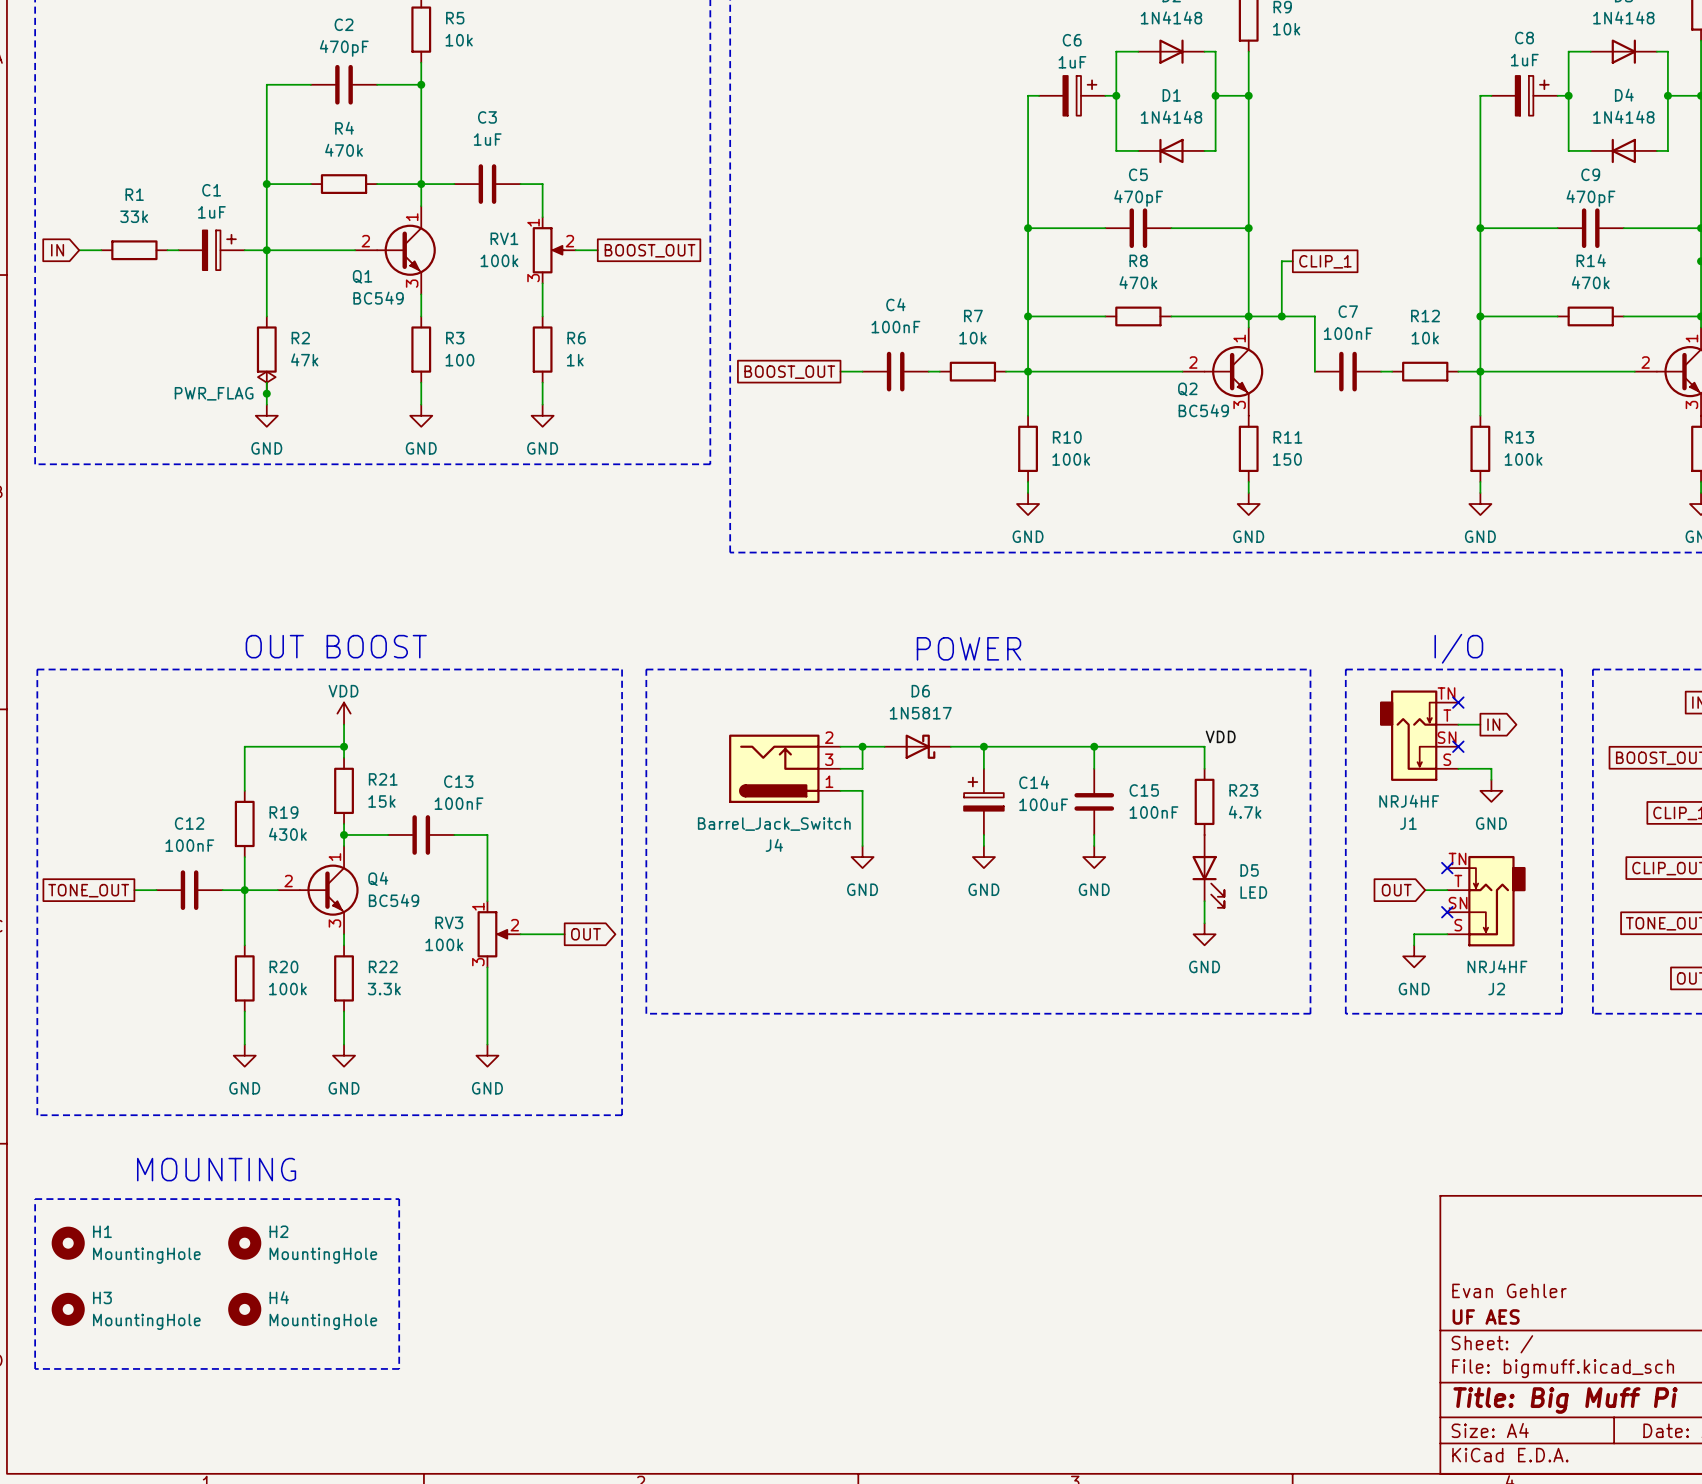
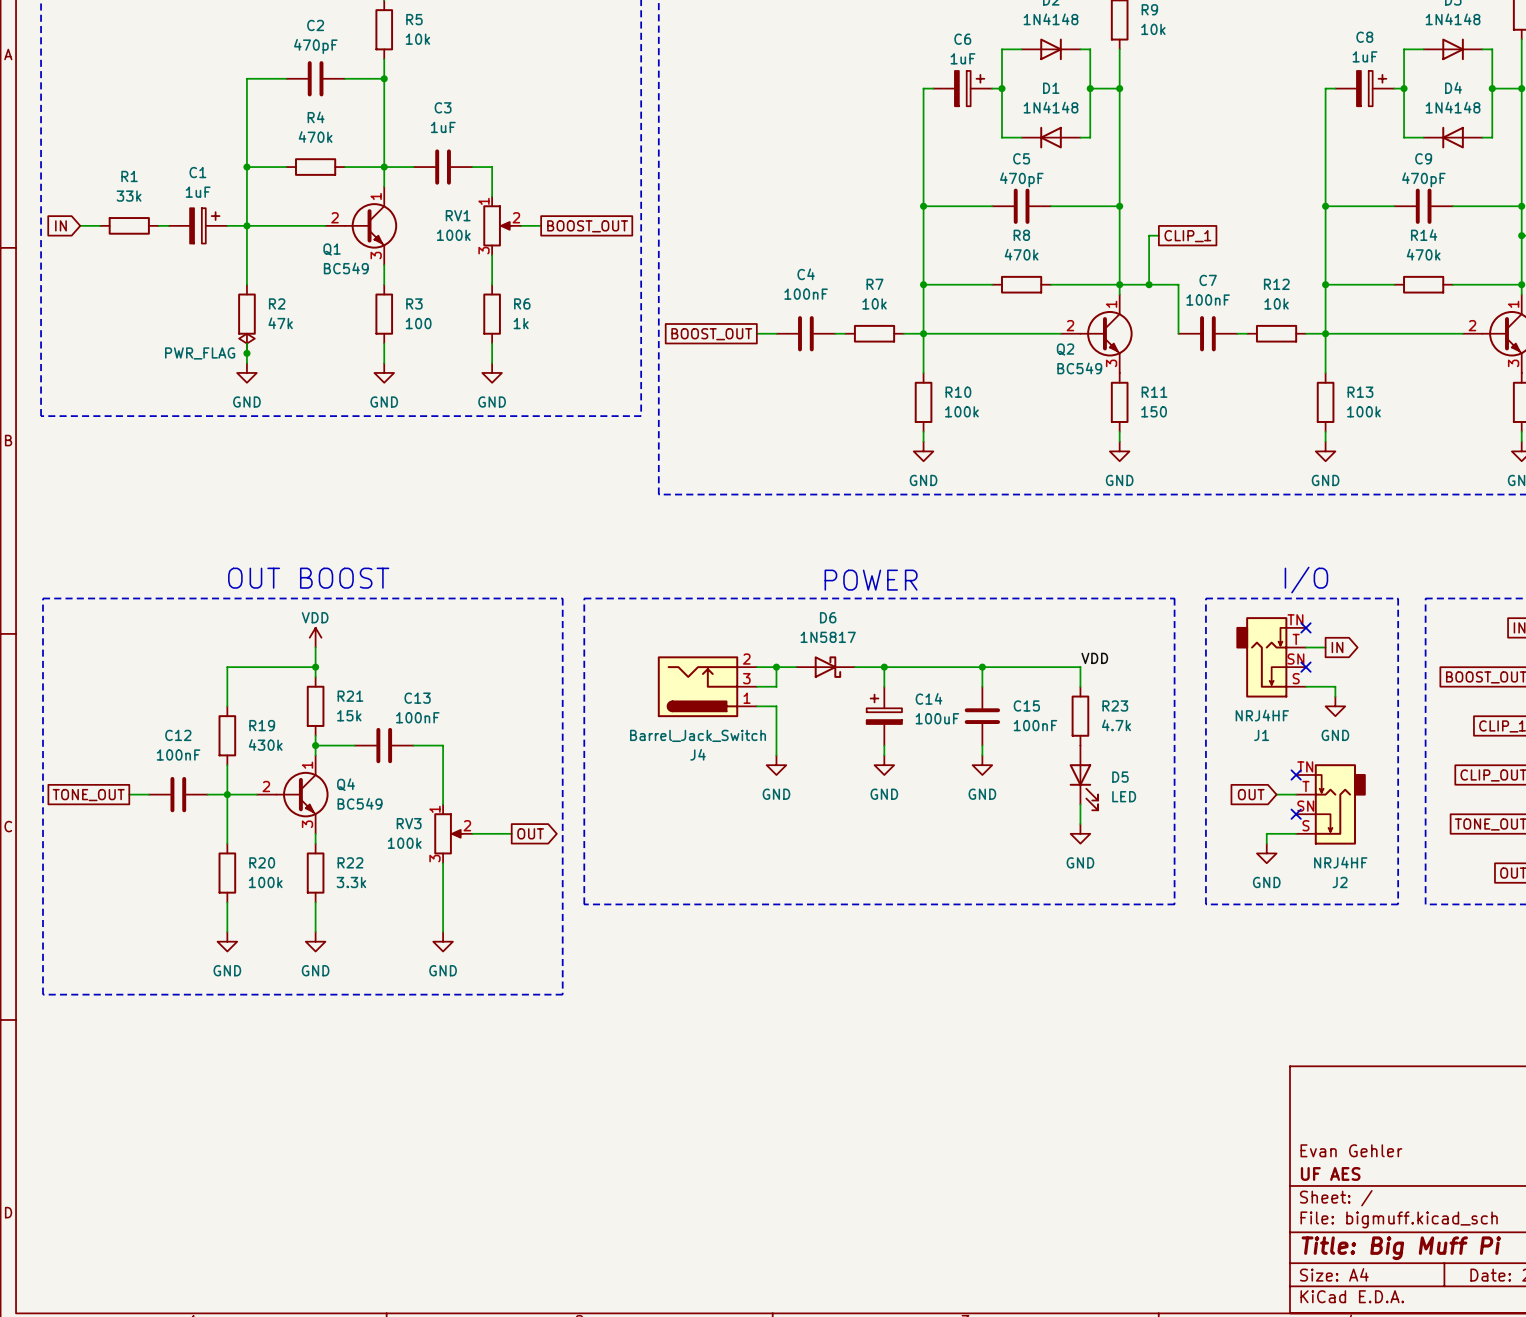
text: MOUNTING (216, 1169) -> none
line: (35, 1199) (399, 1199) (399, 1368) (35, 1368) (35, 1199) -> none
H1: MountingHole (68, 1243) -> none
H2: MountingHole (244, 1243) -> none
H3: MountingHole (68, 1309) -> none
H4: MountingHole (244, 1309) -> none

